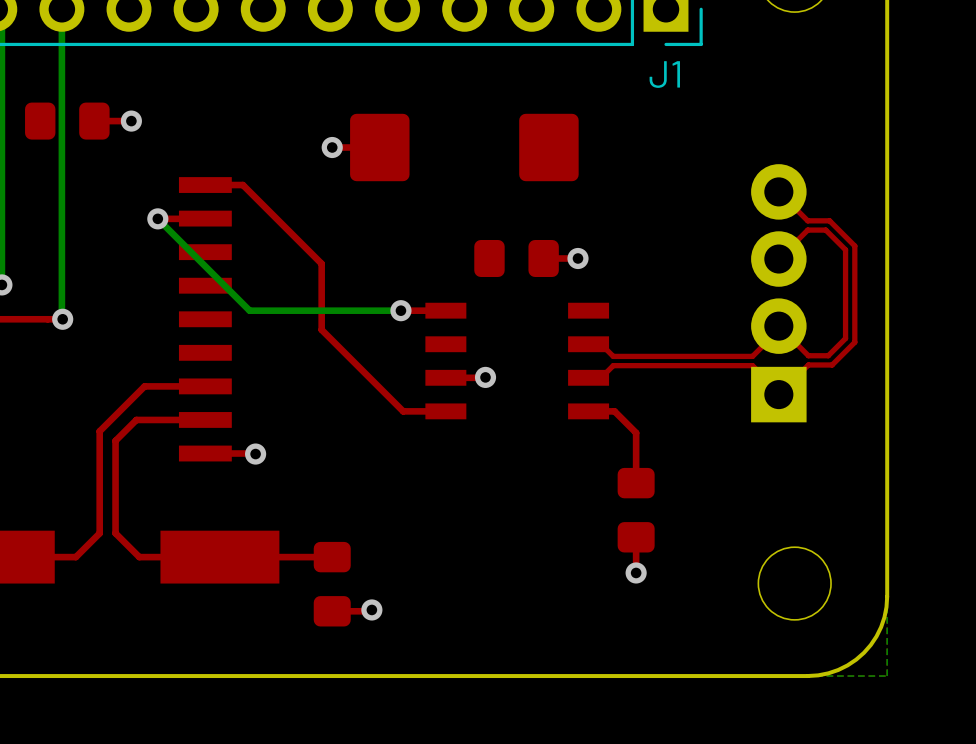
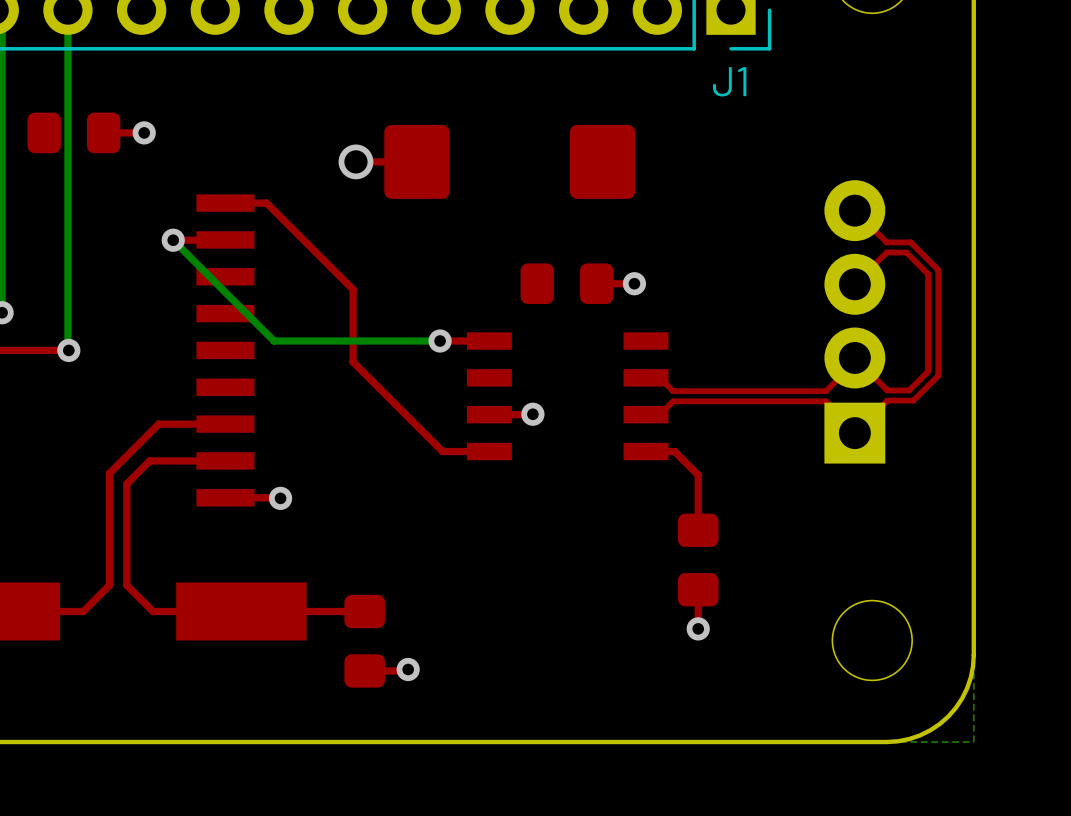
via size: [321, 136, 343, 159] -> [338, 144, 374, 180]

